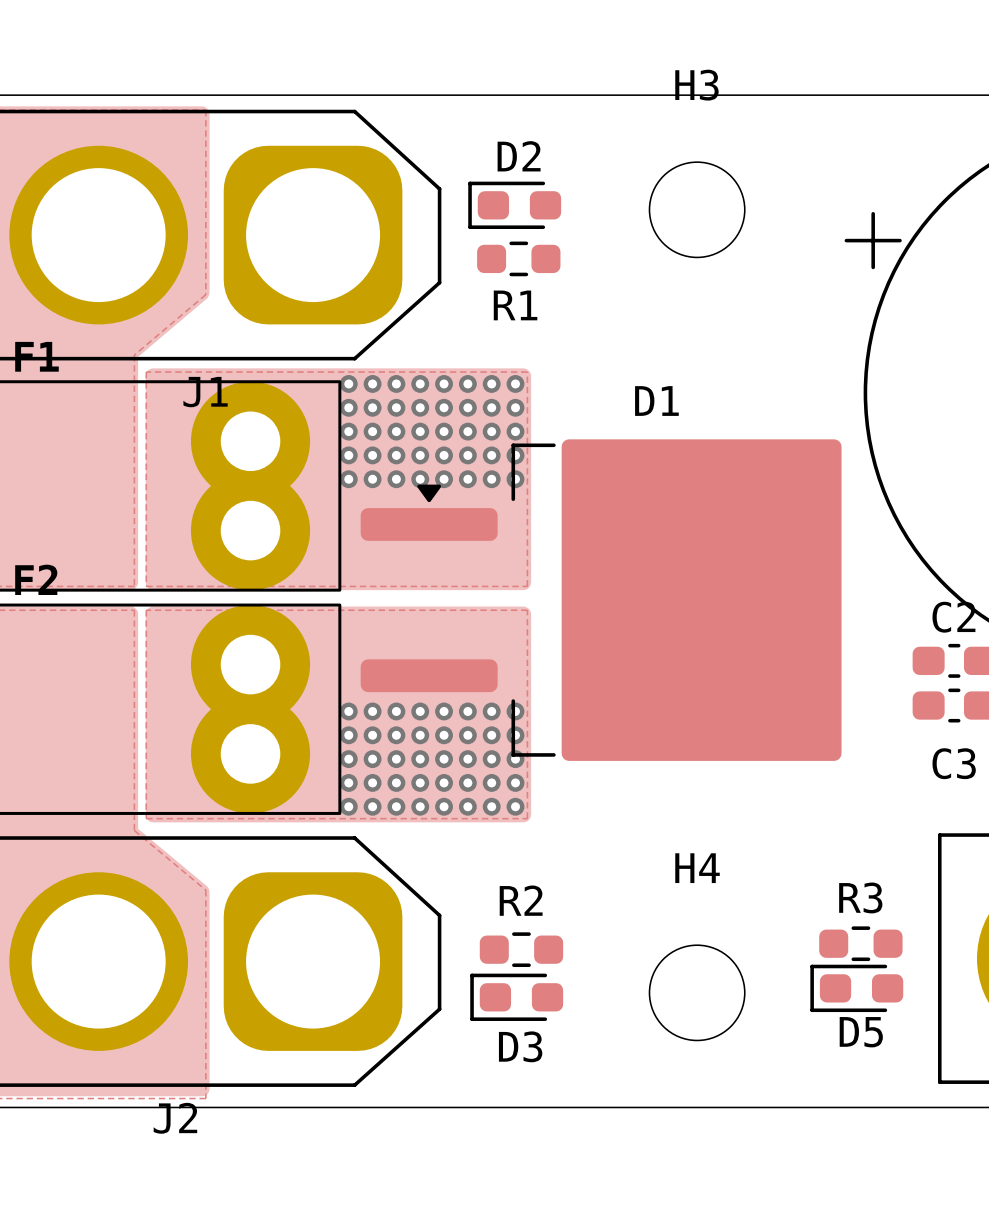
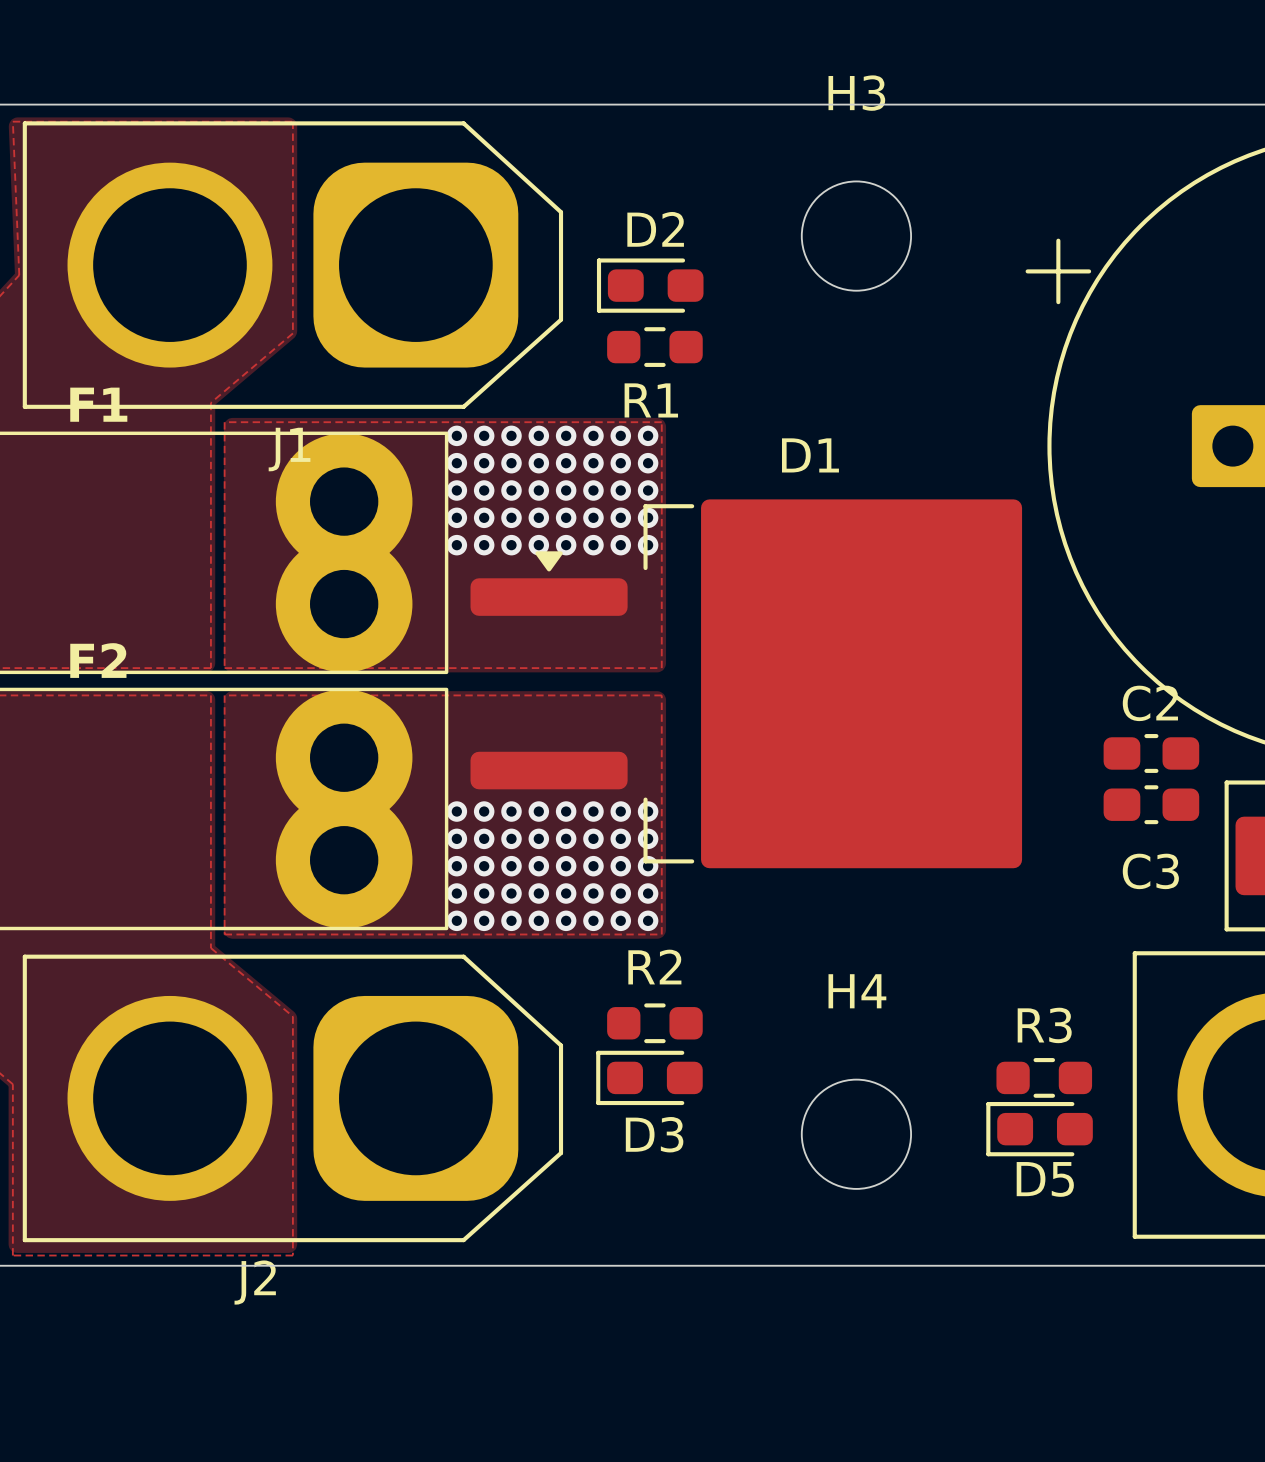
D2 position: (514, 205) -> (650, 285)
R1 position: (518, 258) -> (654, 347)
R2 position: (521, 949) -> (654, 1023)
D3 position: (516, 997) -> (649, 1077)

